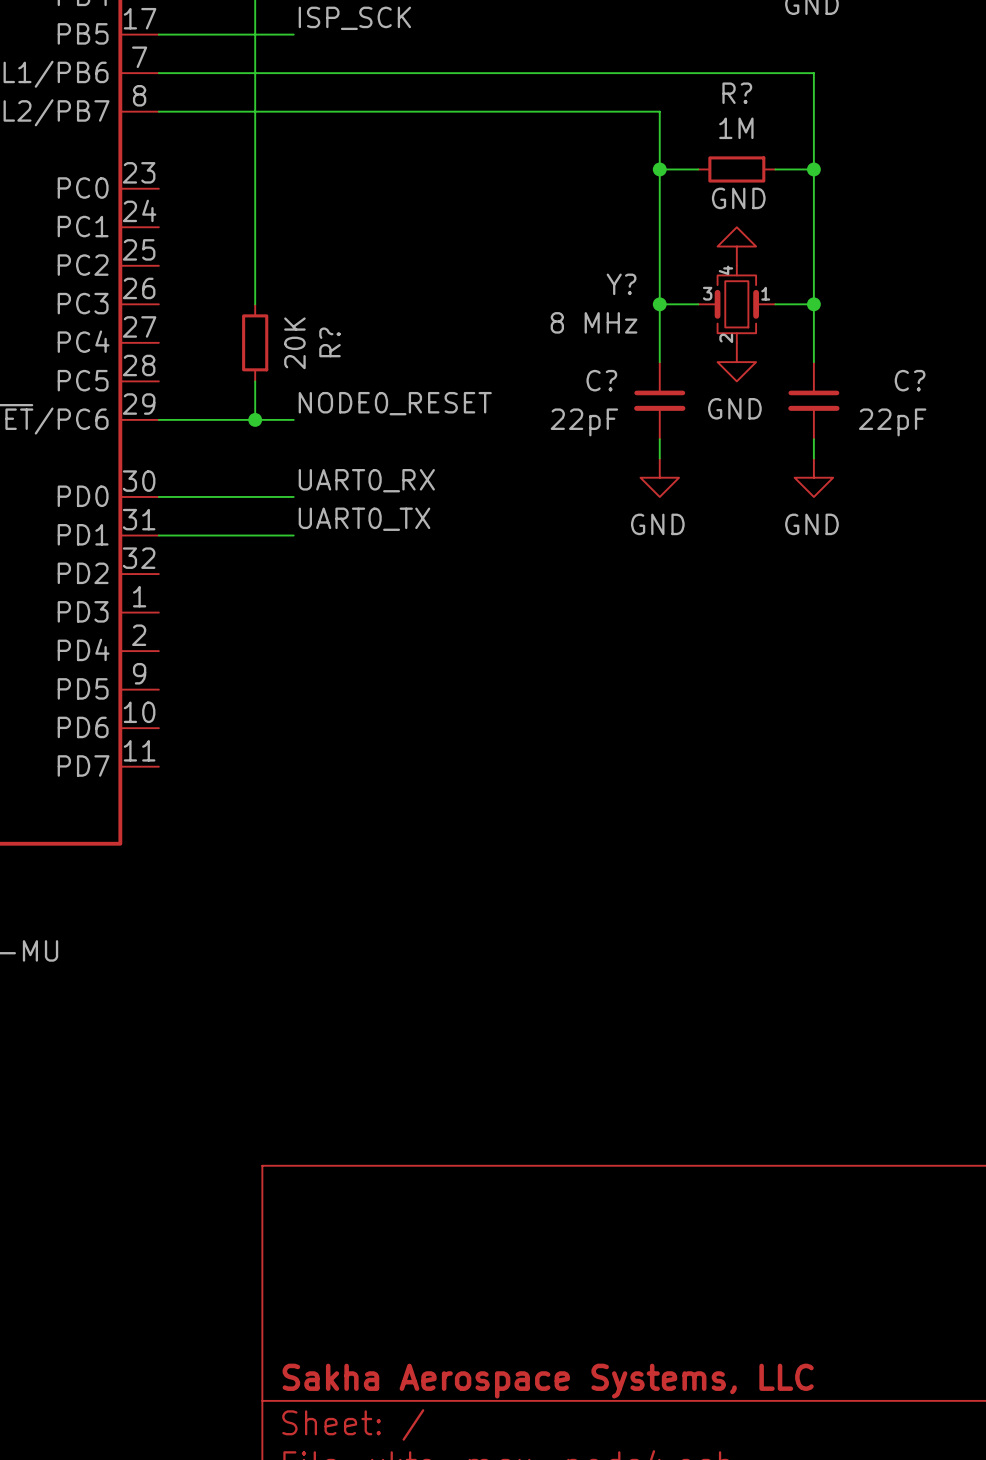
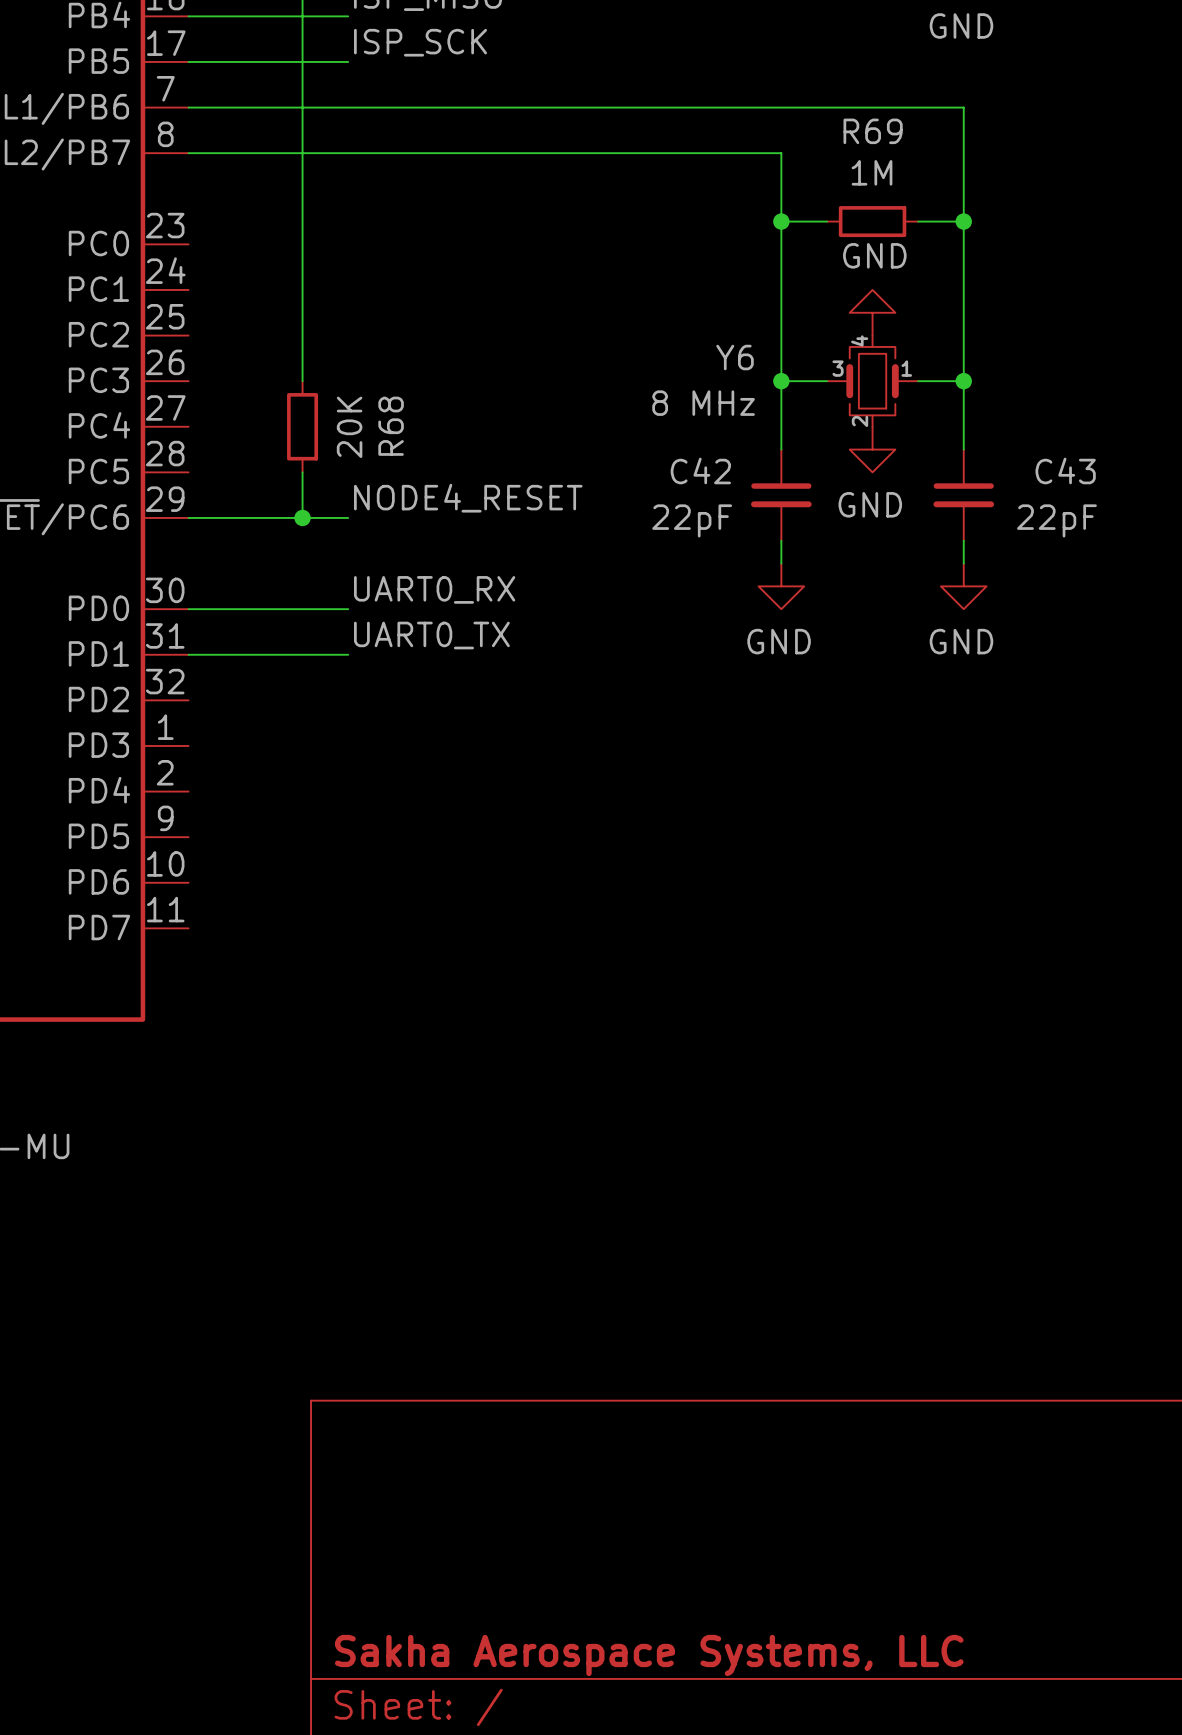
R? name: R? (737, 93) -> R69 (873, 131)
Y? name: Y? (621, 284) -> Y6 (735, 357)
R? name: R? (329, 342) -> R68 (391, 426)
C? name: C? (601, 380) -> C42 (700, 470)
C? name: C? (910, 380) -> C43 (1065, 470)
label: NODE0_RESET (395, 403) -> NODE4_RESET (468, 498)

